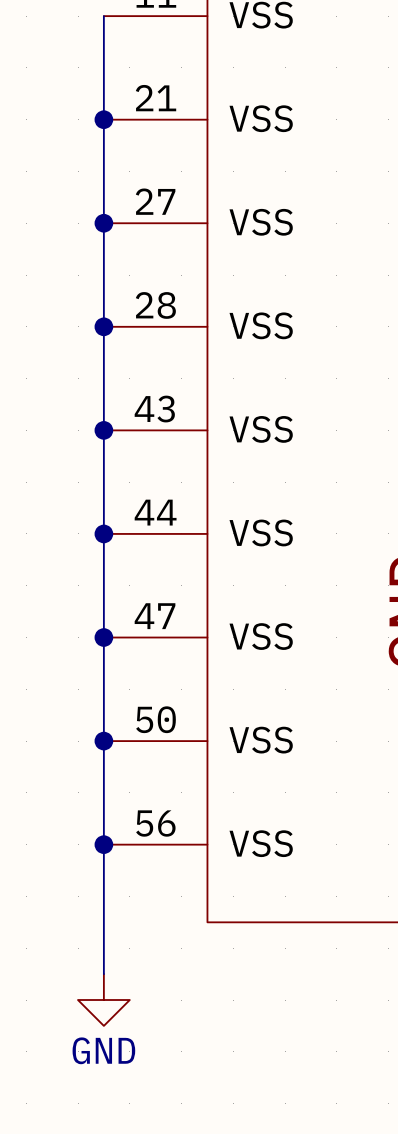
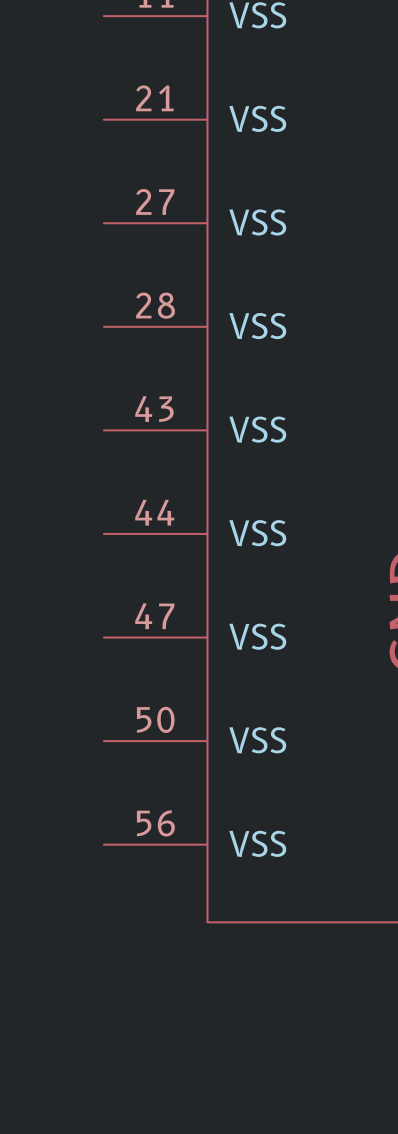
wire: (103, 16) (103, 974) -> none
junction: (103, 119) -> none
junction: (103, 223) -> none
junction: (103, 326) -> none
junction: (103, 430) -> none
junction: (103, 533) -> none
junction: (103, 637) -> none
junction: (103, 741) -> none
junction: (103, 844) -> none
power symbol: GND (103, 1000) -> none

